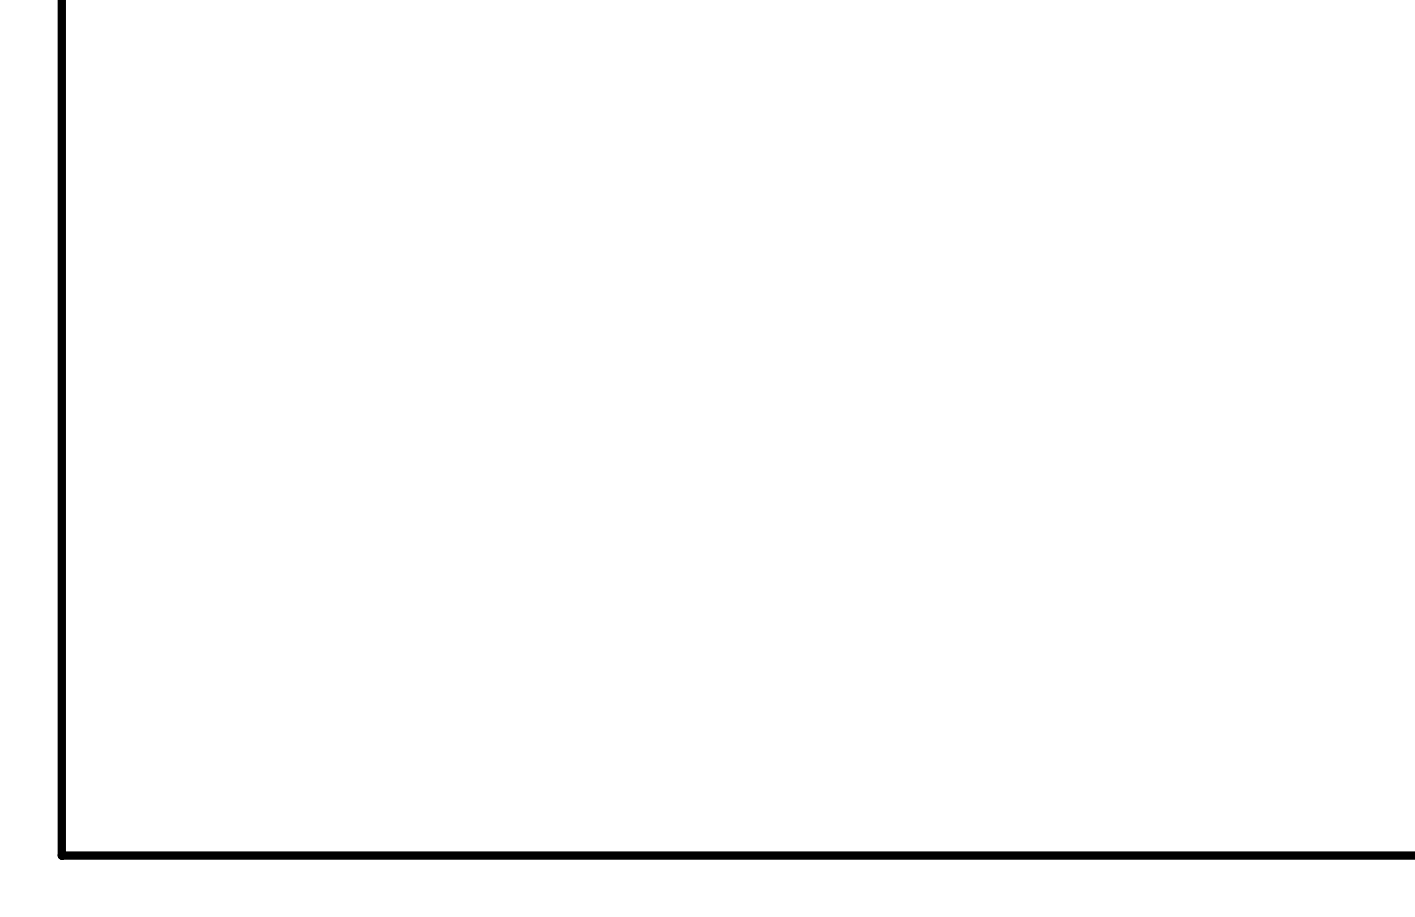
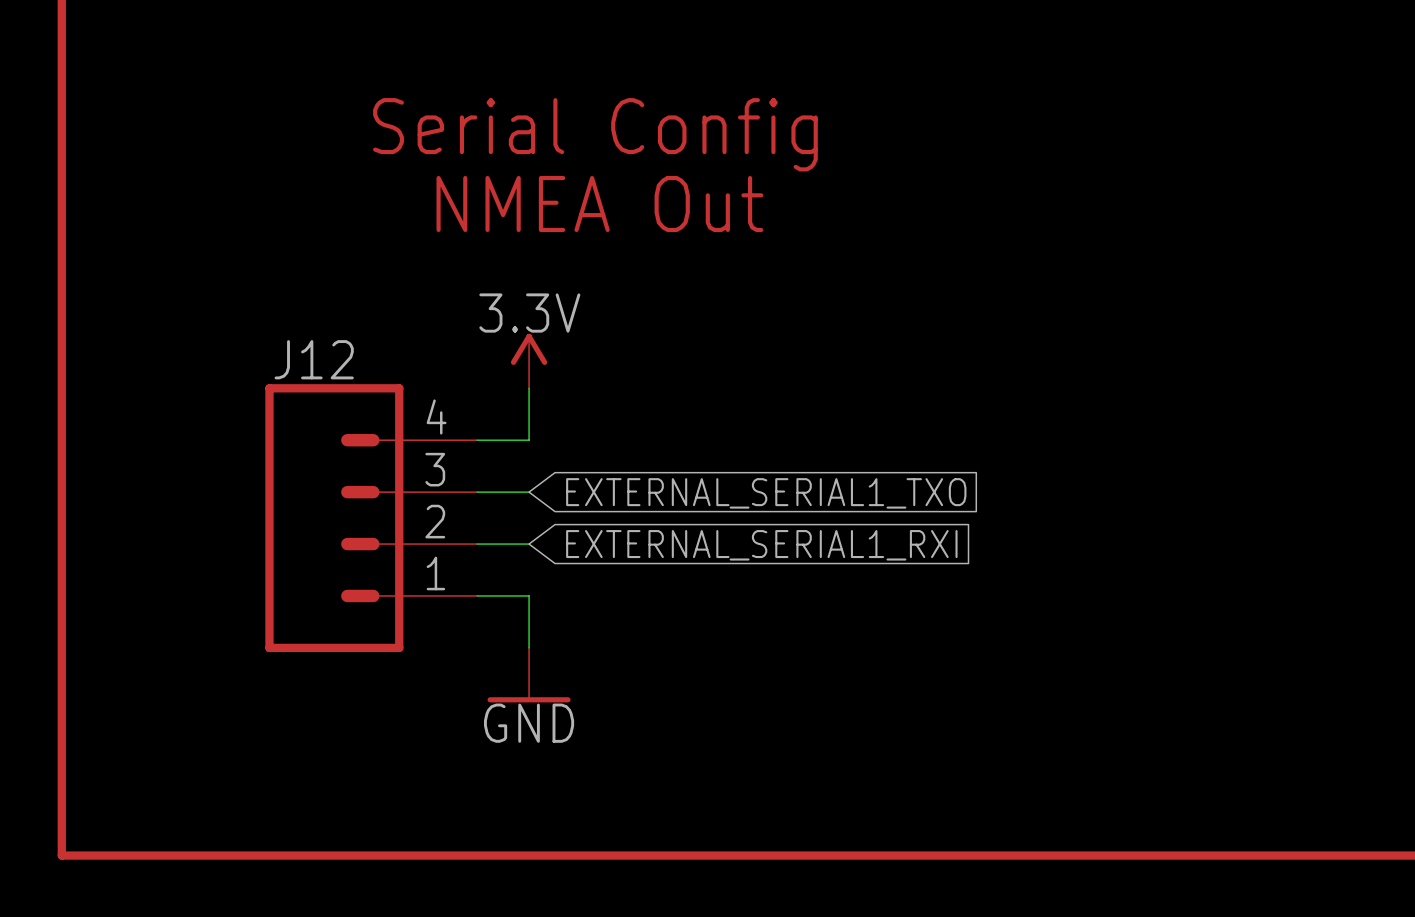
text: none -> Serial Config (595, 134)
text: none -> NMEA Out (599, 203)
power symbol: none -> 3.3V (529, 361)
wire: none -> (529, 388) (529, 440) (477, 440)
wire: none -> (477, 492) (529, 492)
global label: none -> EXTERNAL_SERIAL1_TXO (766, 493)
J12: none -> (371, 518)
wire: none -> (477, 544) (529, 544)
global label: none -> EXTERNAL_SERIAL1_RXI (761, 545)
wire: none -> (477, 595) (529, 595) (529, 647)
power symbol: none -> GND (529, 675)

